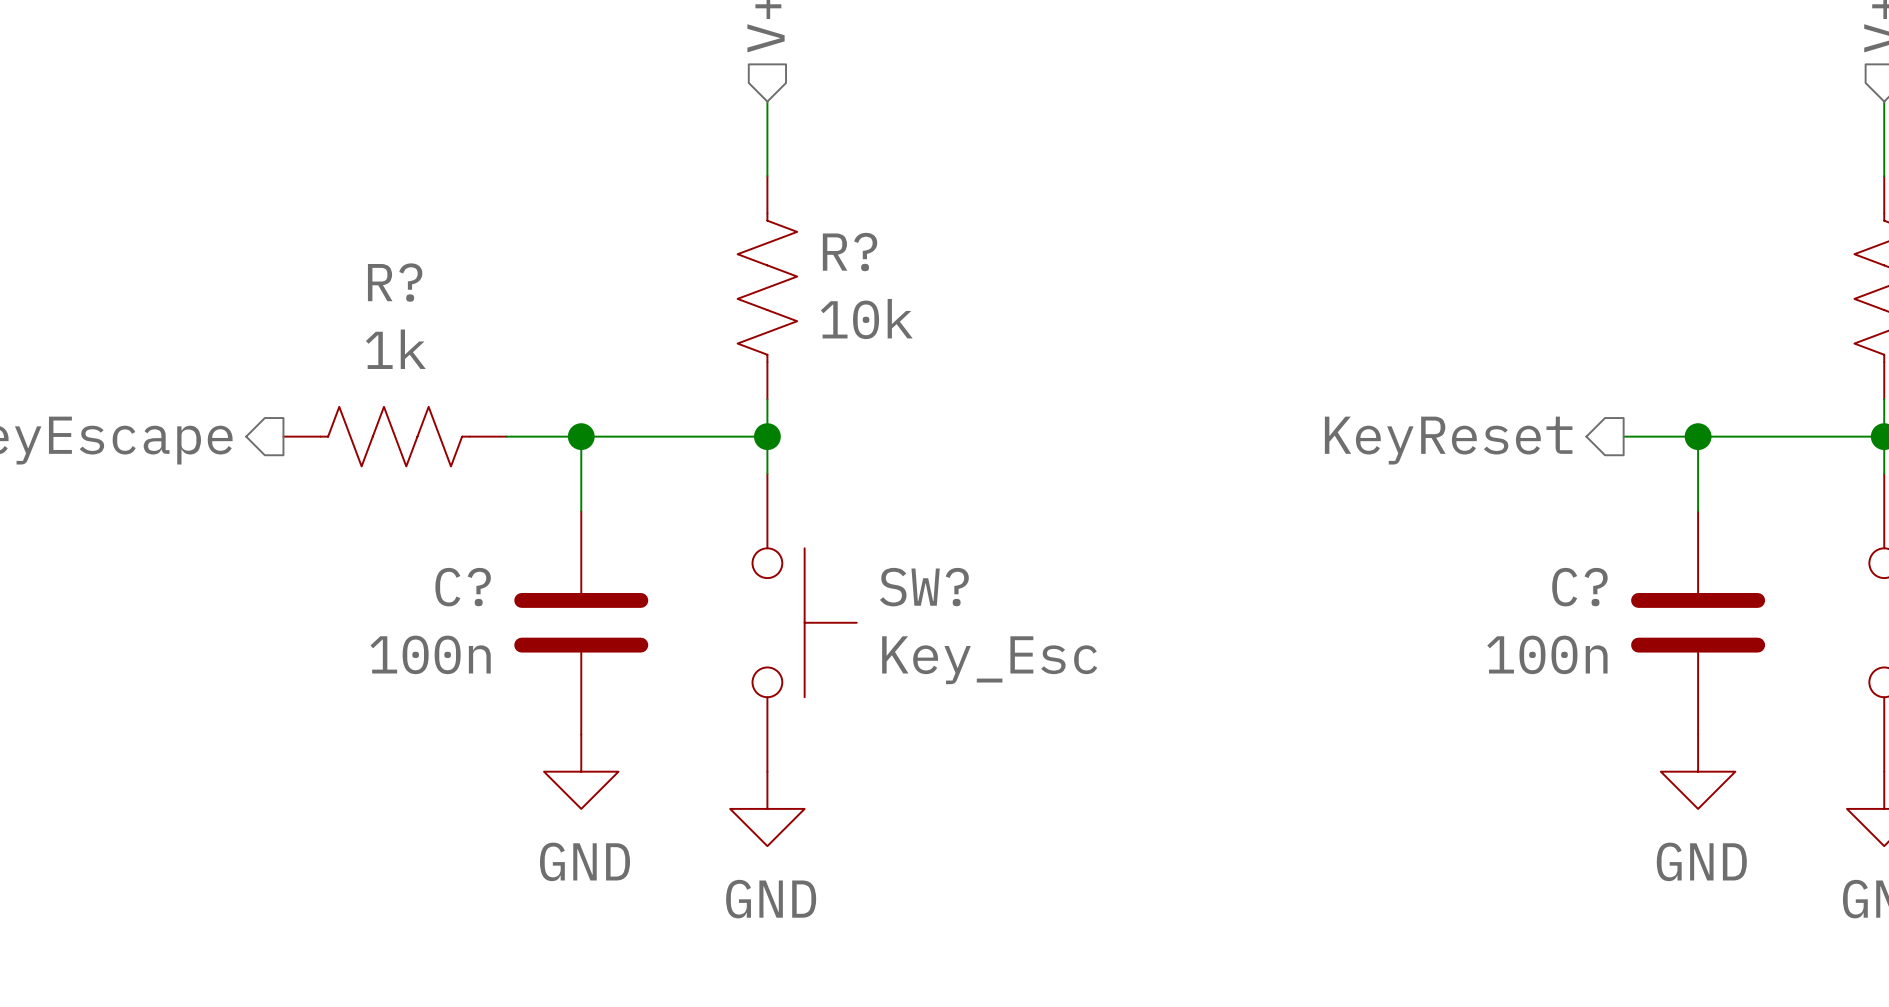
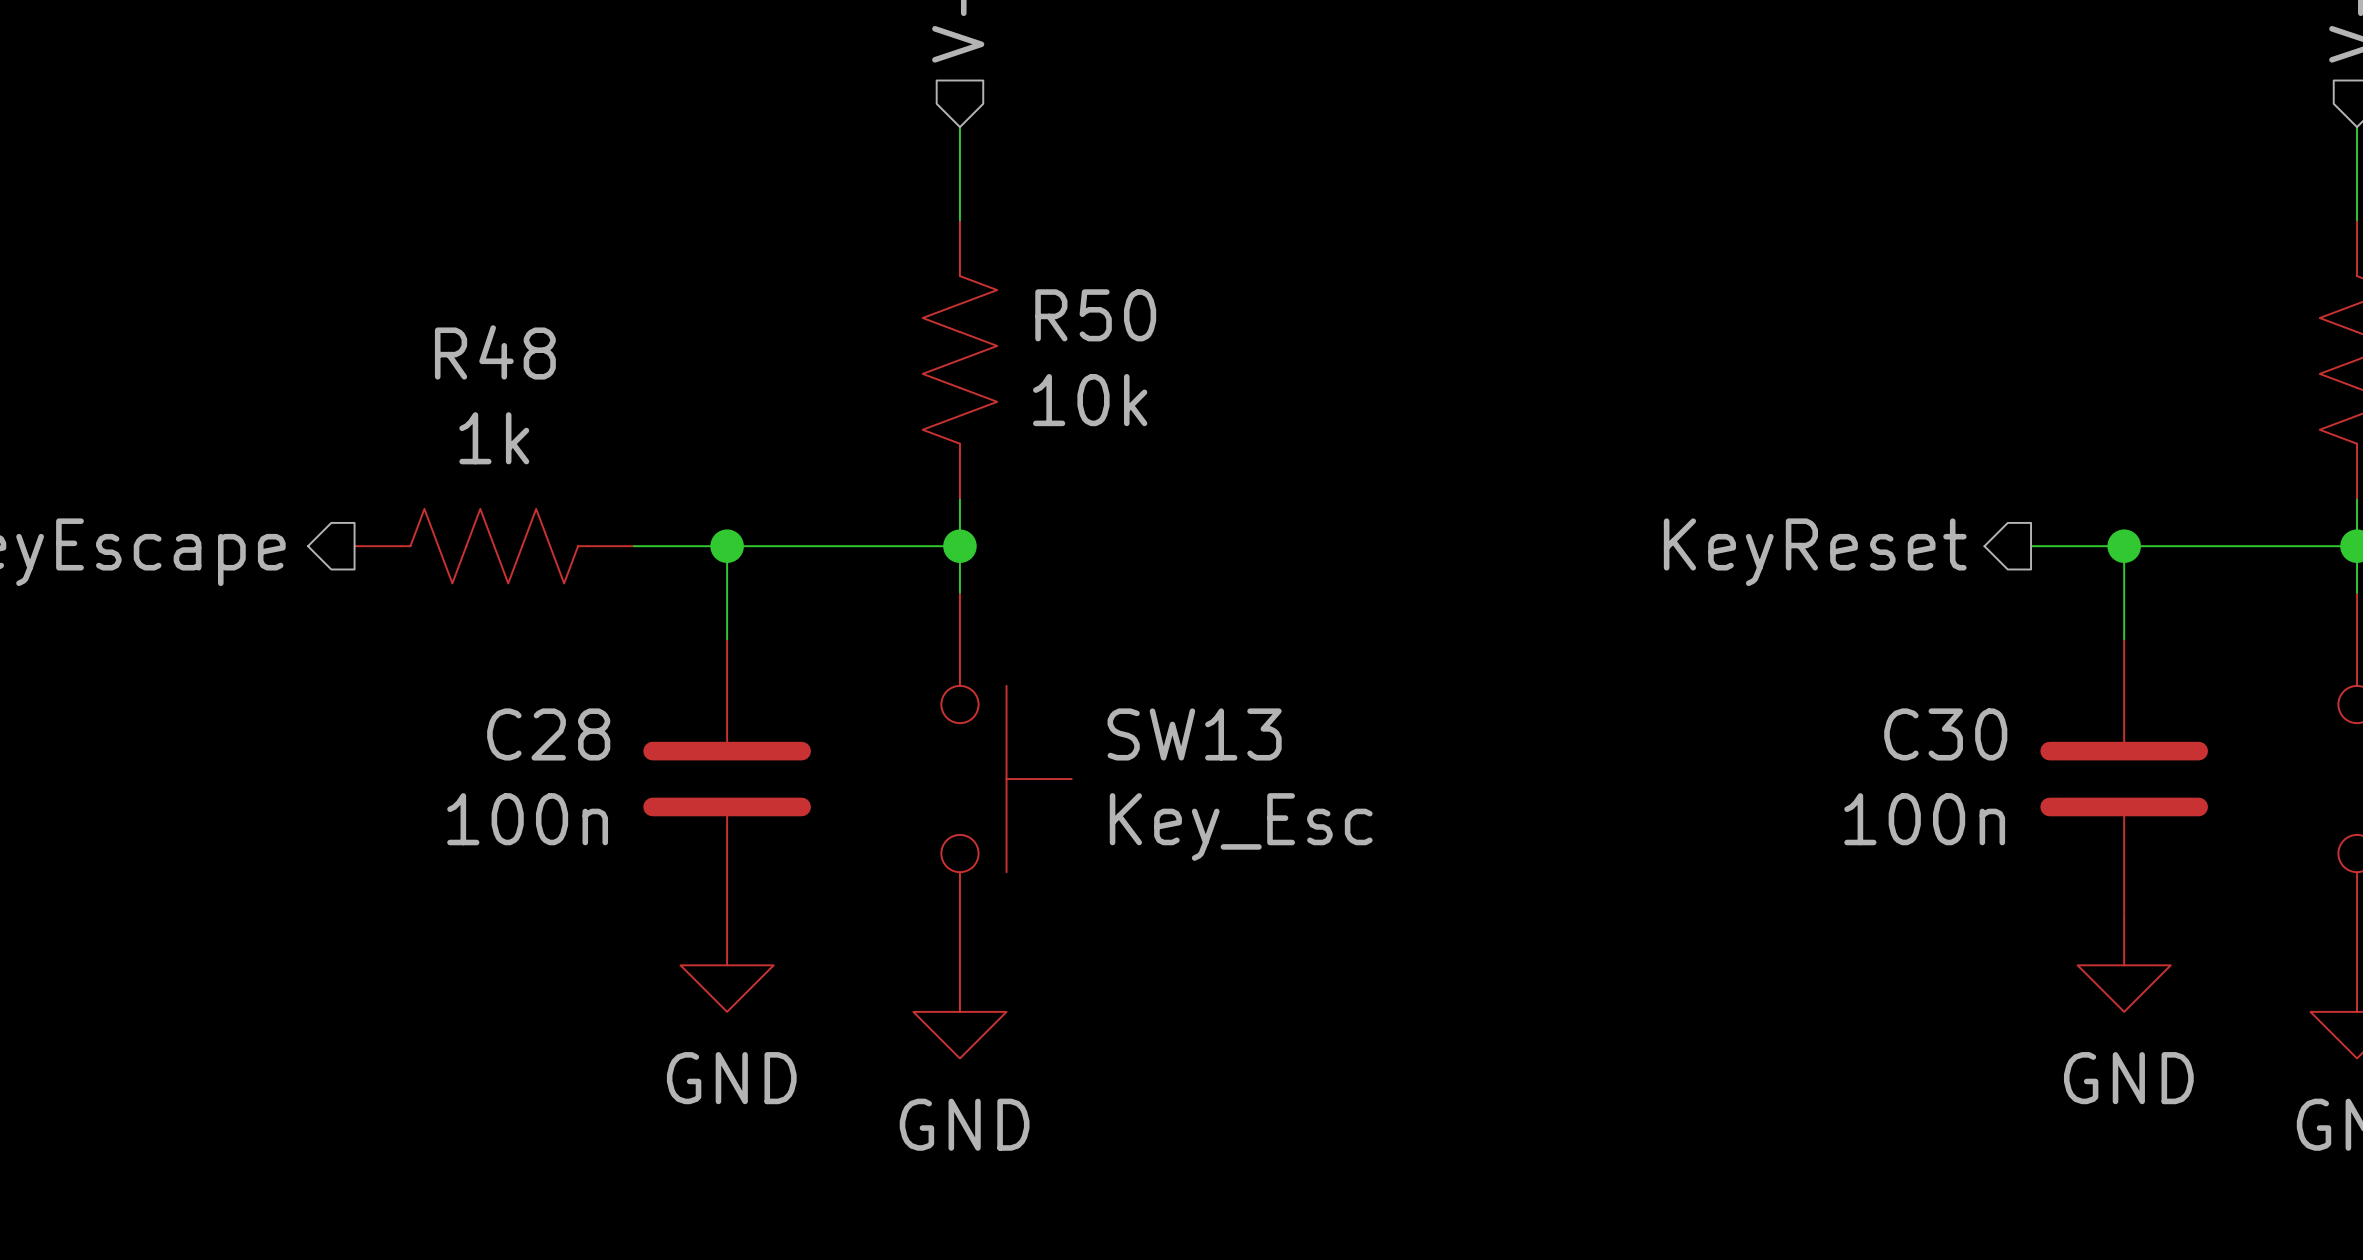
R? name: R? (850, 252) -> R50 (1095, 315)
R? name: R? (395, 282) -> R48 (495, 352)
C? name: C? (463, 587) -> C28 (548, 734)
SW? name: SW? (924, 587) -> SW13 (1194, 734)
C? name: C? (1579, 587) -> C30 (1945, 734)

